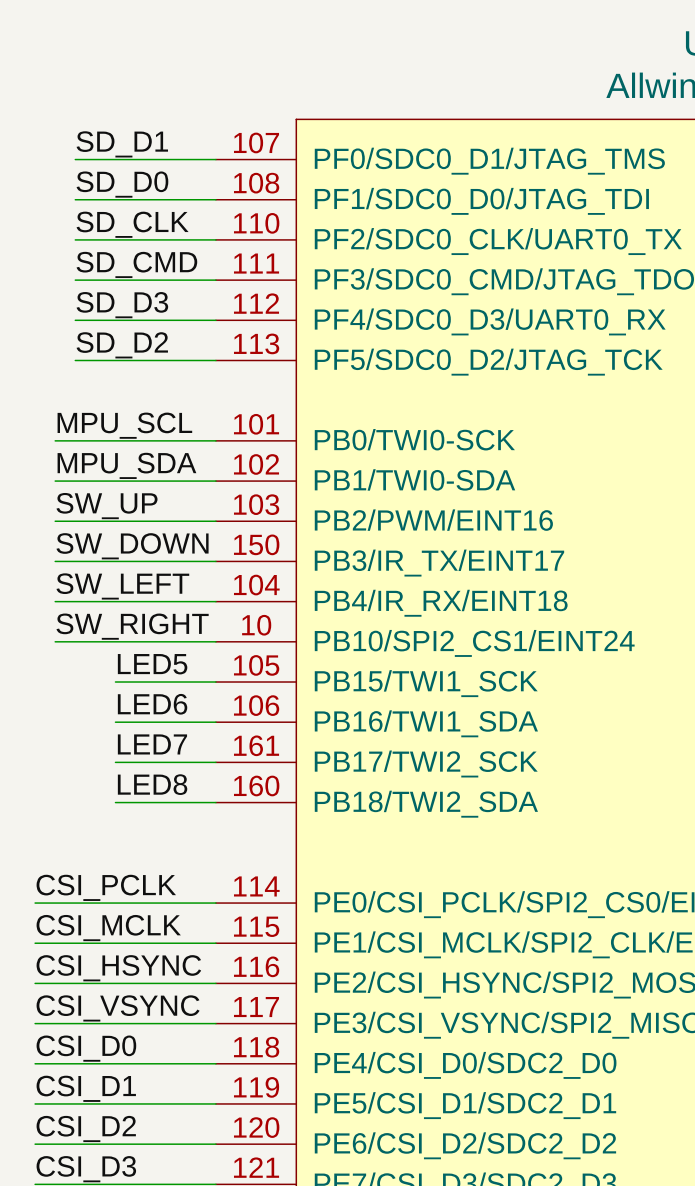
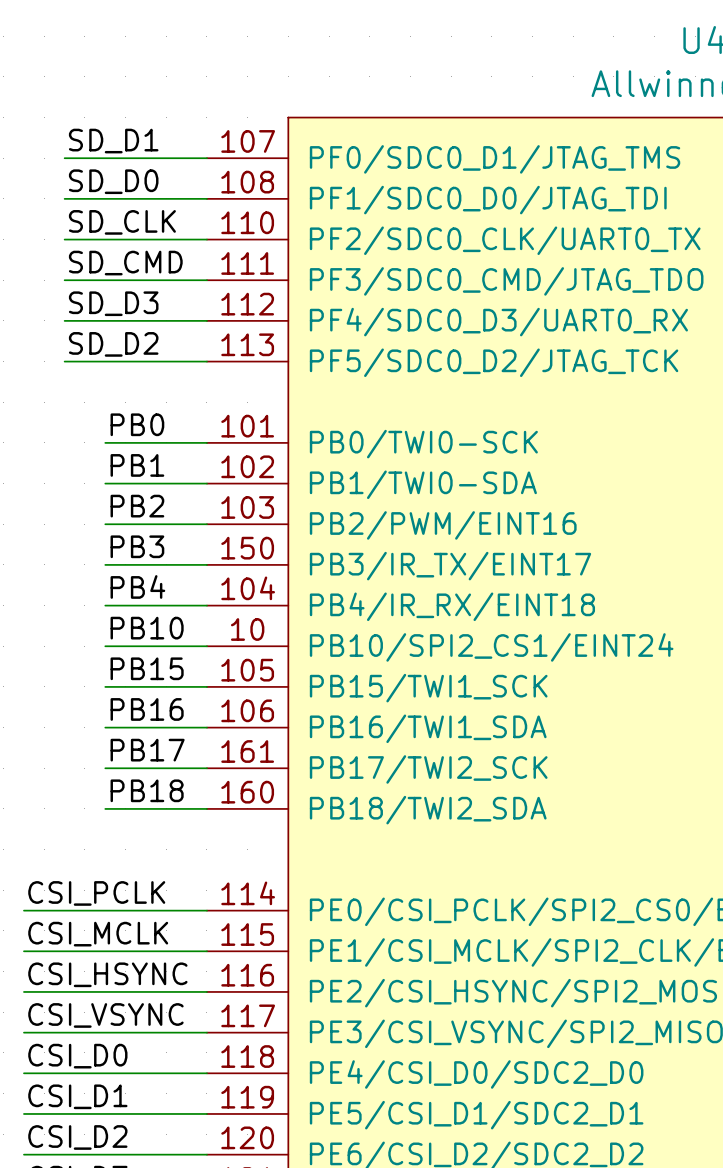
label: none -> PB0 (137, 424)
label: MPU_SCL (124, 425) -> none
wire: (55, 440) (115, 440) -> none
label: none -> PB1 (137, 465)
label: MPU_SDA (126, 465) -> none
wire: (55, 481) (115, 481) -> none
label: none -> PB2 (137, 506)
label: SW_UP (107, 506) -> none
wire: (55, 521) (115, 521) -> none
label: none -> PB3 (137, 546)
label: SW_DOWN (132, 546) -> none
wire: (55, 561) (115, 561) -> none
label: none -> PB4 (137, 586)
label: SW_LEFT (122, 586) -> none
wire: (55, 601) (115, 601) -> none
label: none -> PB10 (147, 628)
label: SW_RIGHT (132, 626) -> none
wire: (55, 641) (115, 641) -> none
label: LED5 (152, 664) -> PB15 (147, 668)
label: LED6 (152, 704) -> PB16 (147, 709)
label: LED7 (152, 744) -> PB17 (147, 750)
label: LED8 (152, 784) -> PB18 (147, 790)

